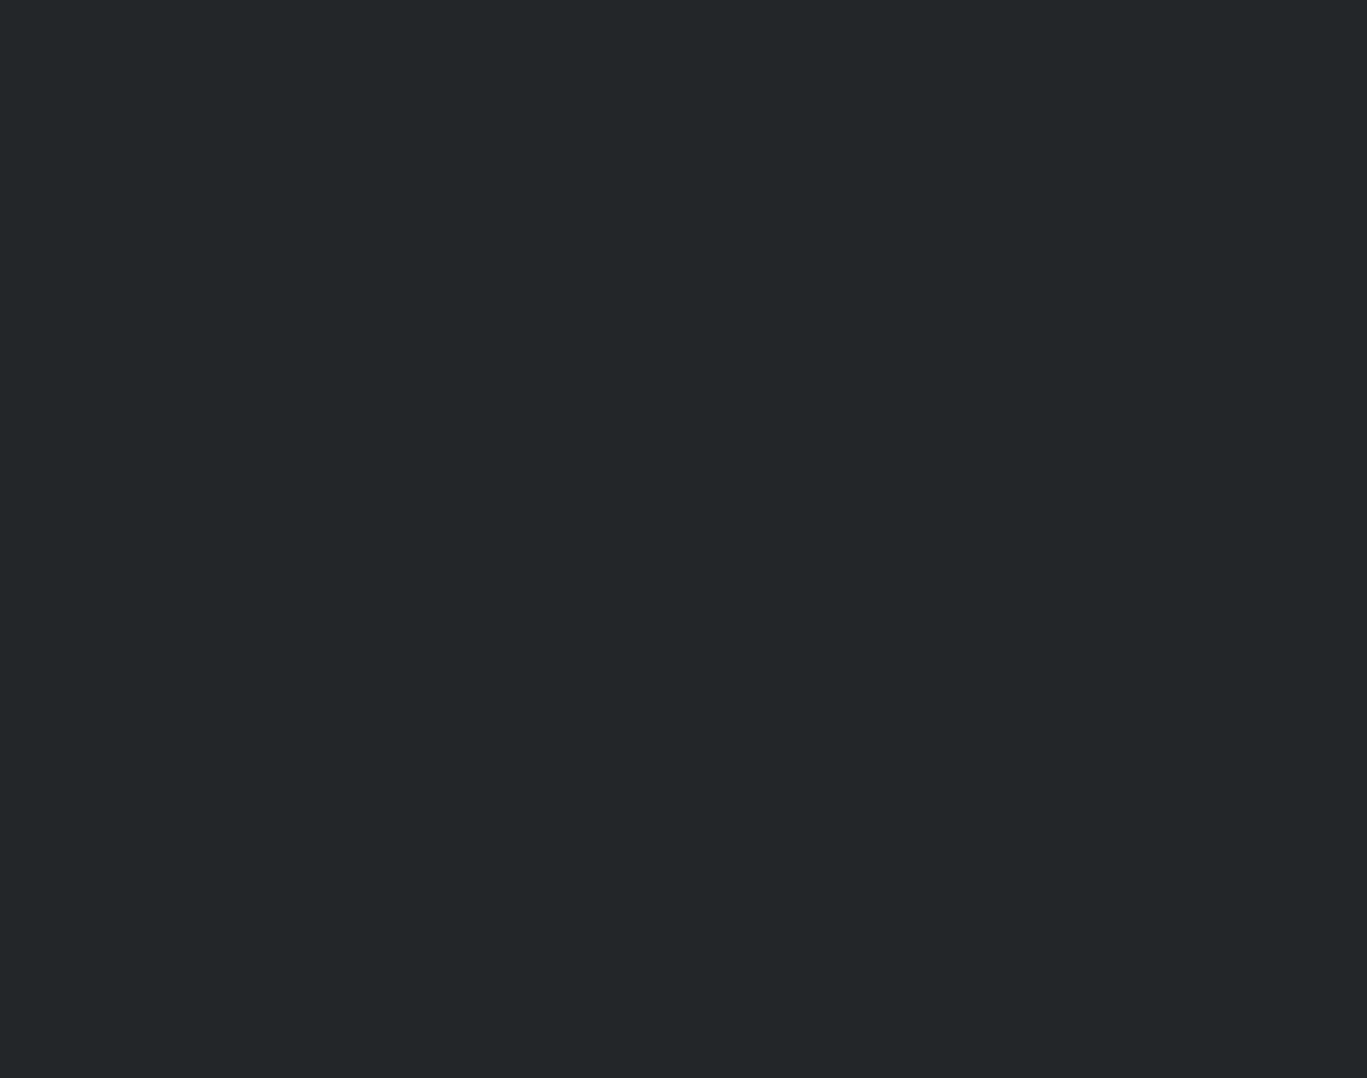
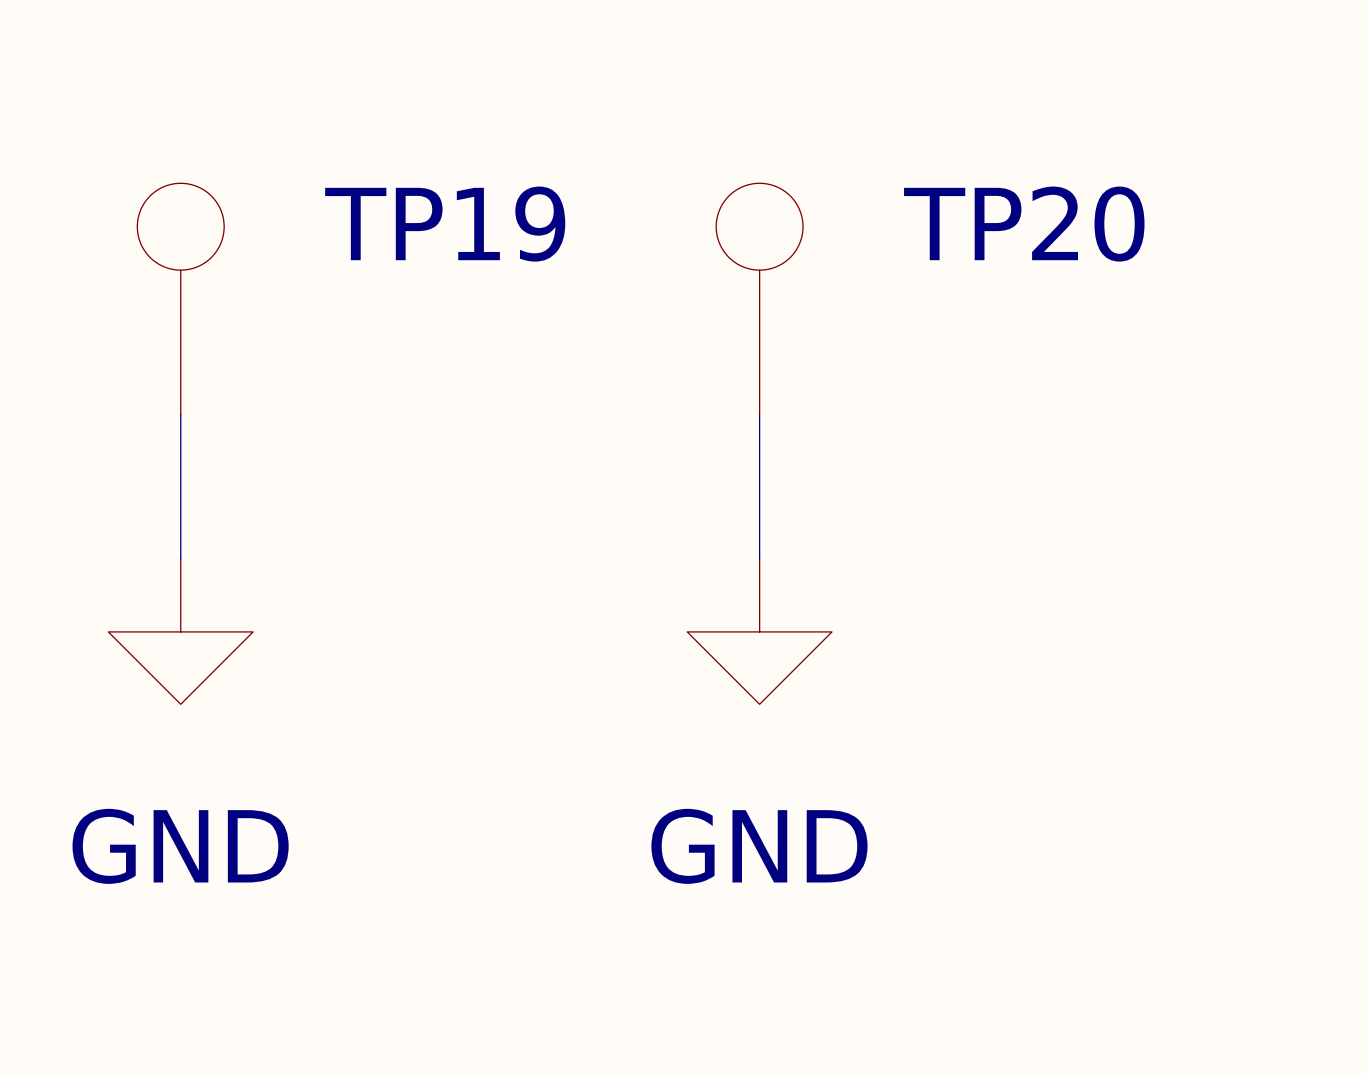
TP19: none -> (180, 299)
TP20: none -> (759, 299)
wire: none -> (180, 414) (180, 559)
wire: none -> (759, 414) (759, 559)
power symbol: none -> GND (180, 631)
power symbol: none -> GND (759, 631)

